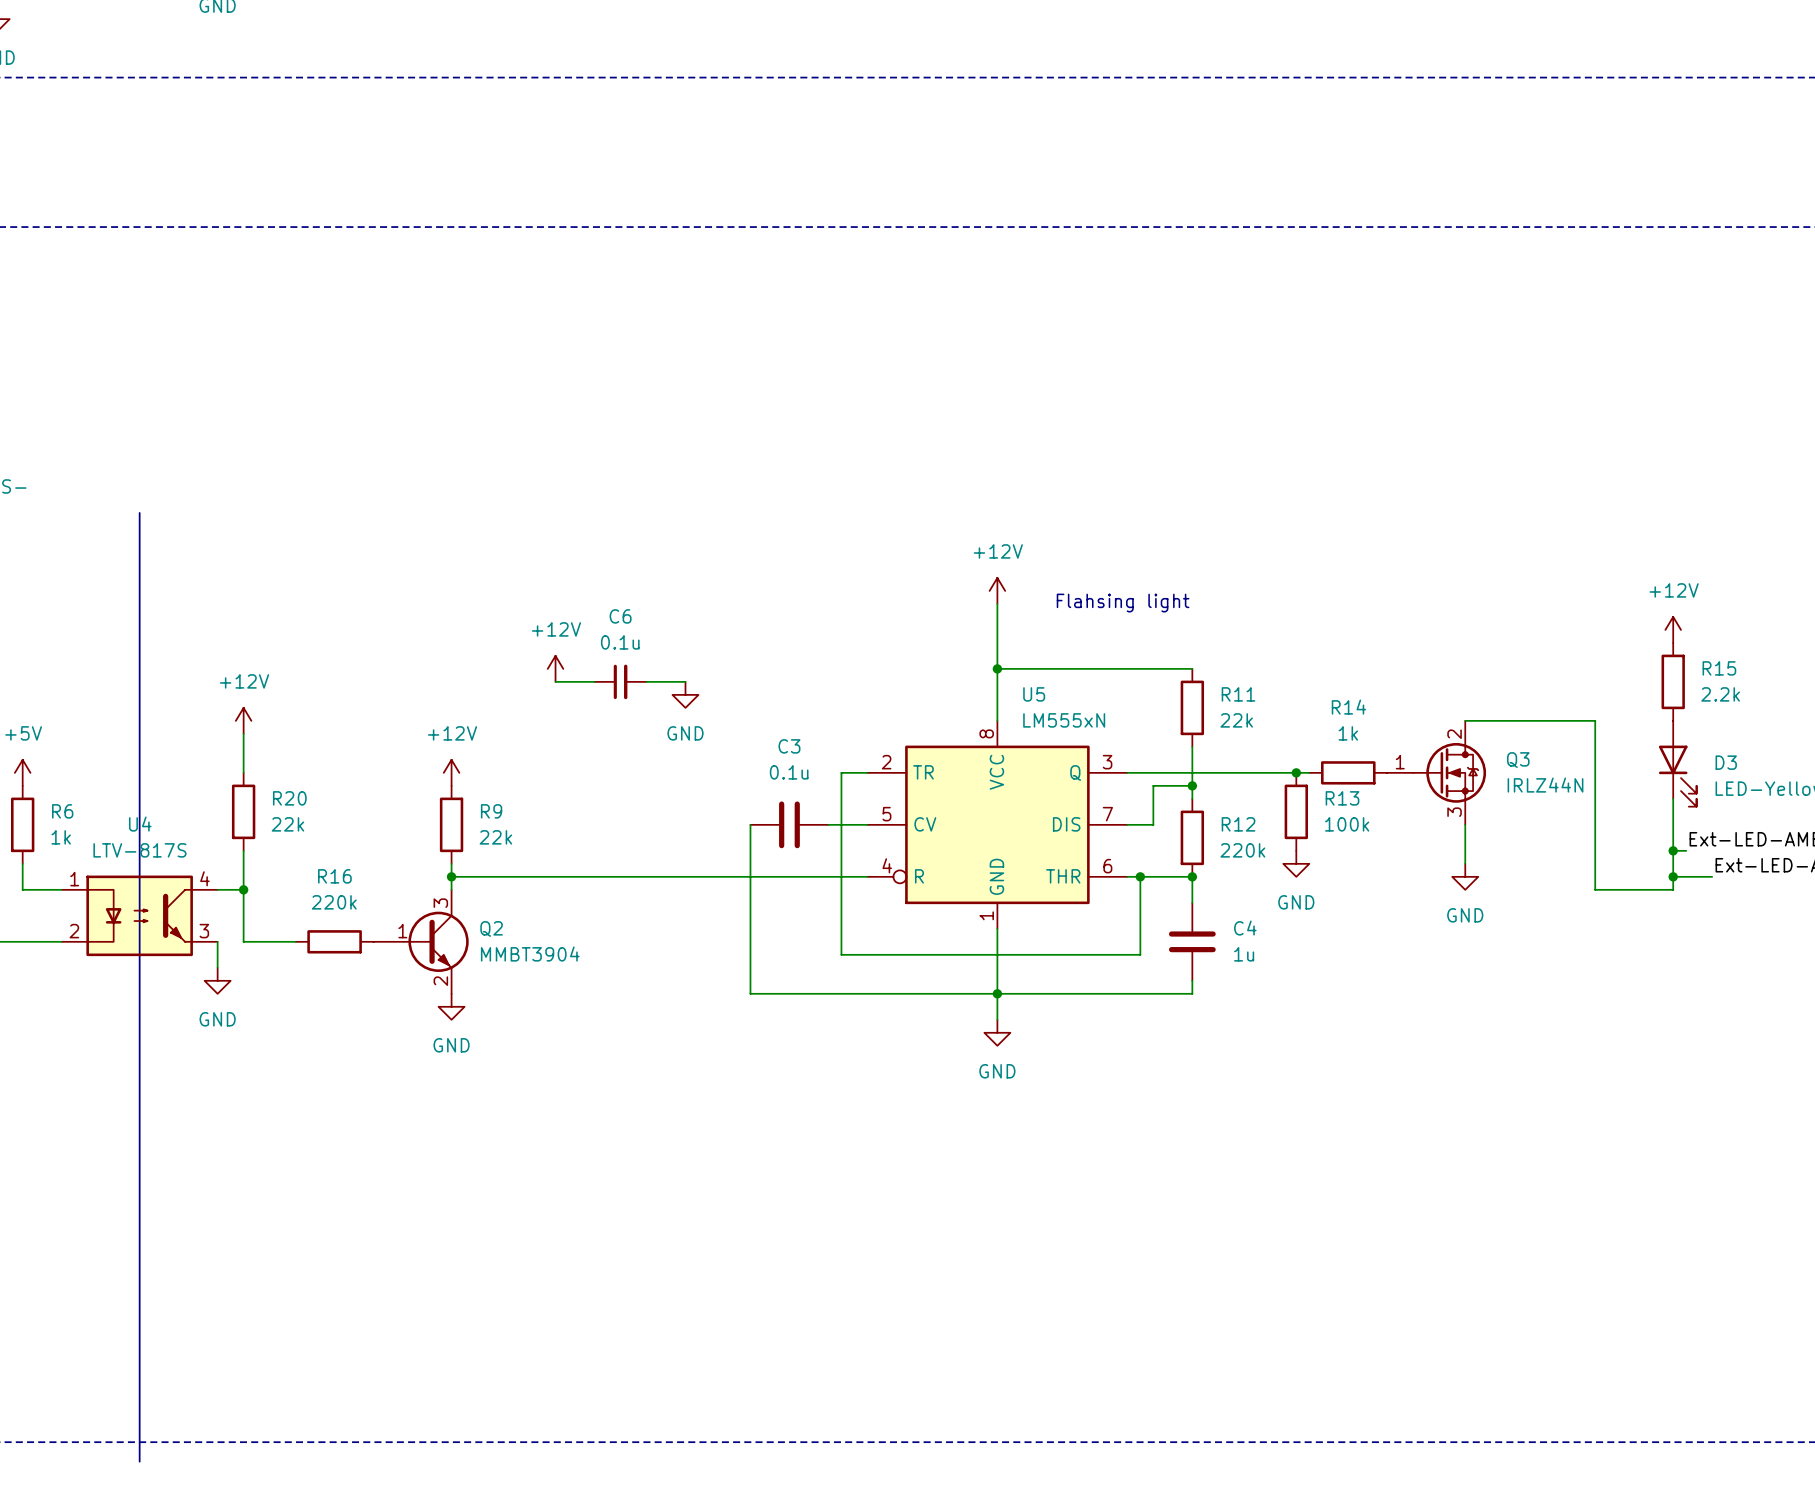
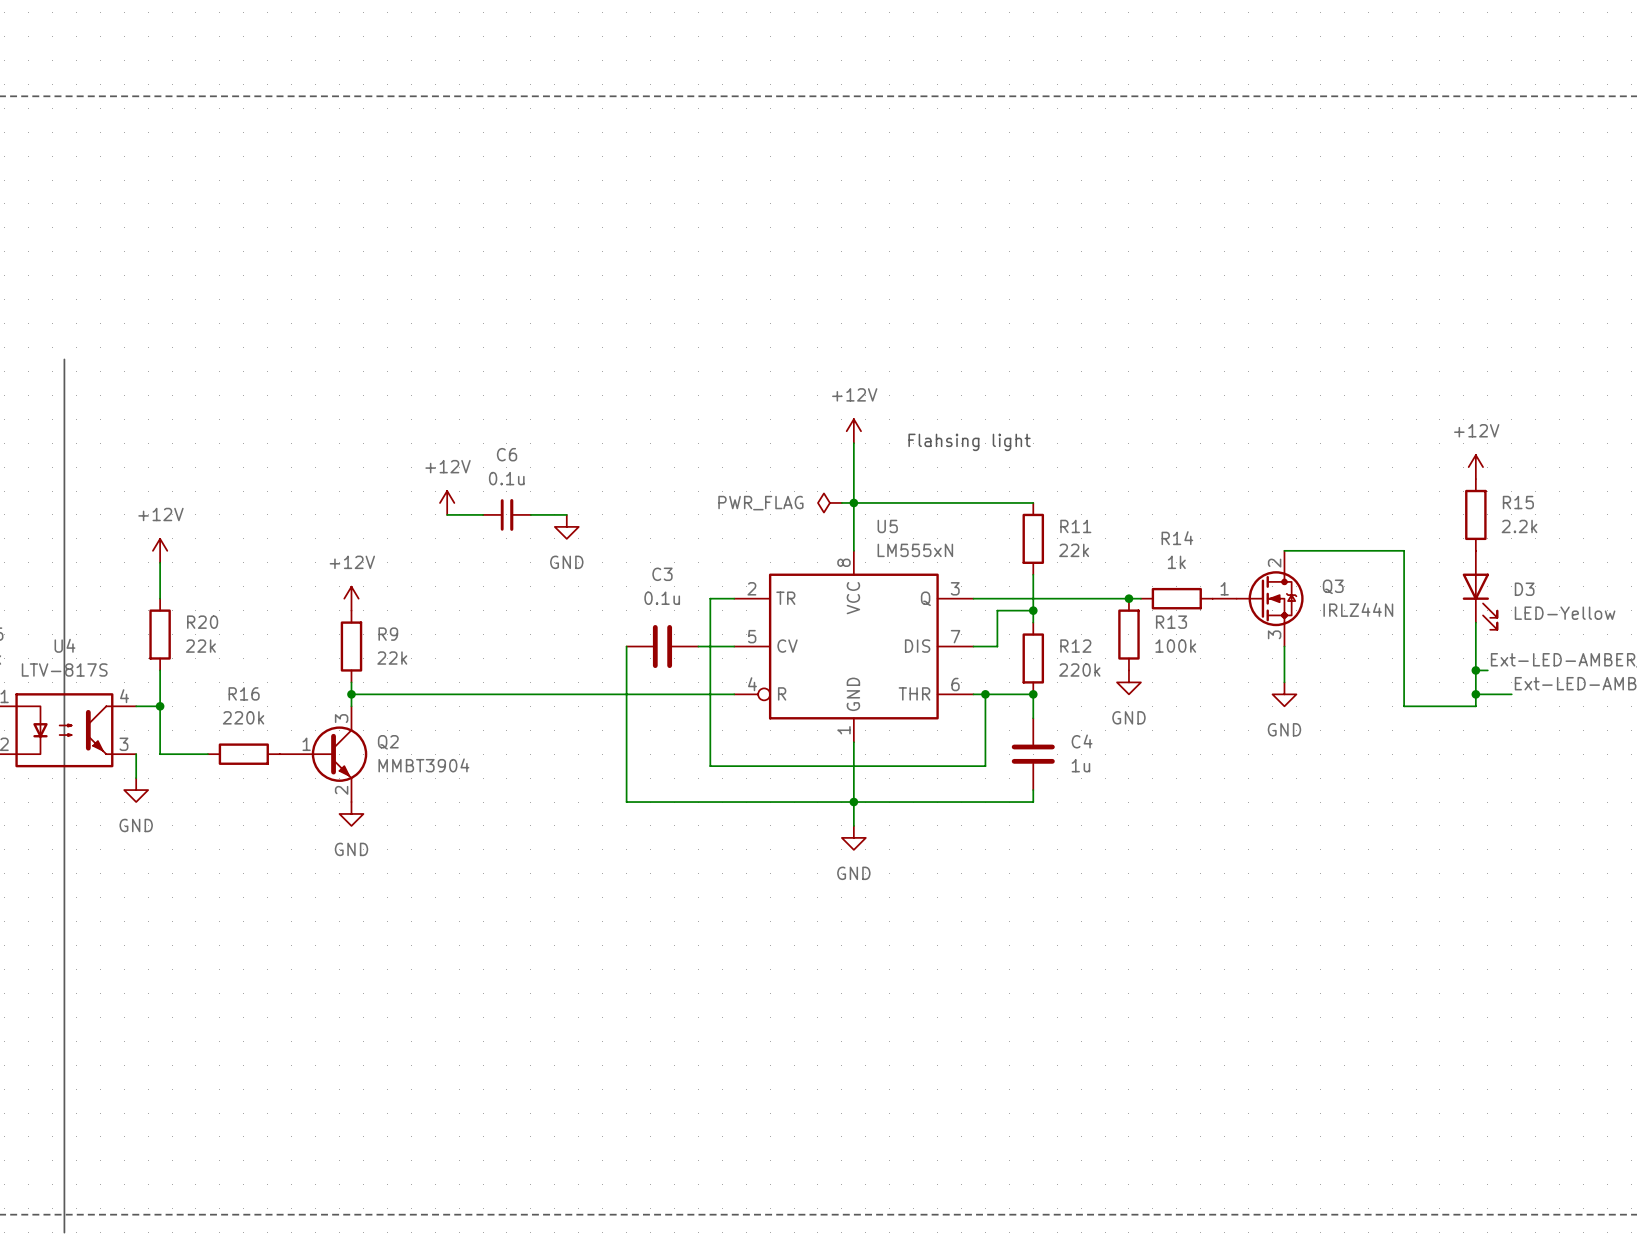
power symbol: none -> PWR_FLAG (829, 502)
wire: none -> (841, 502) (853, 502)

